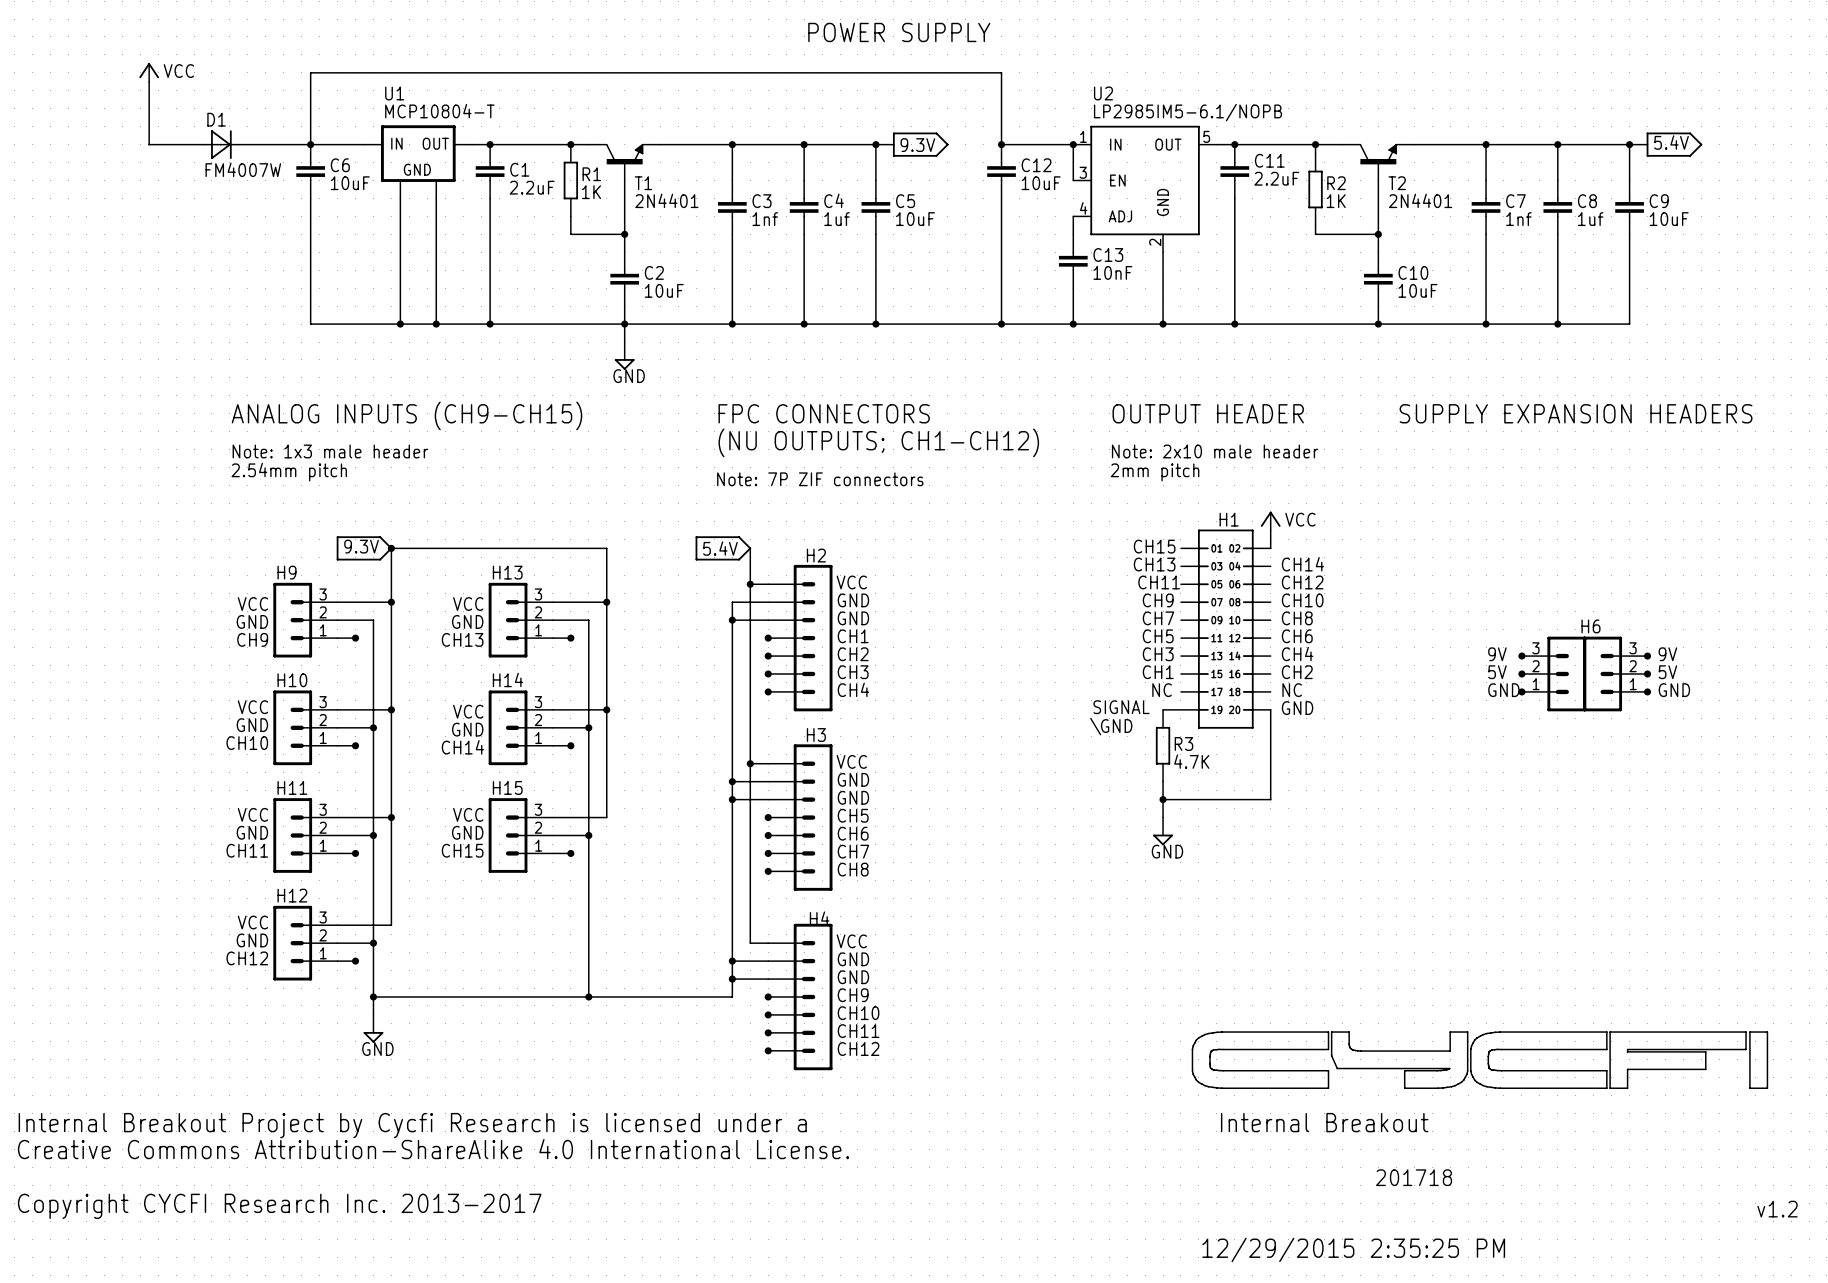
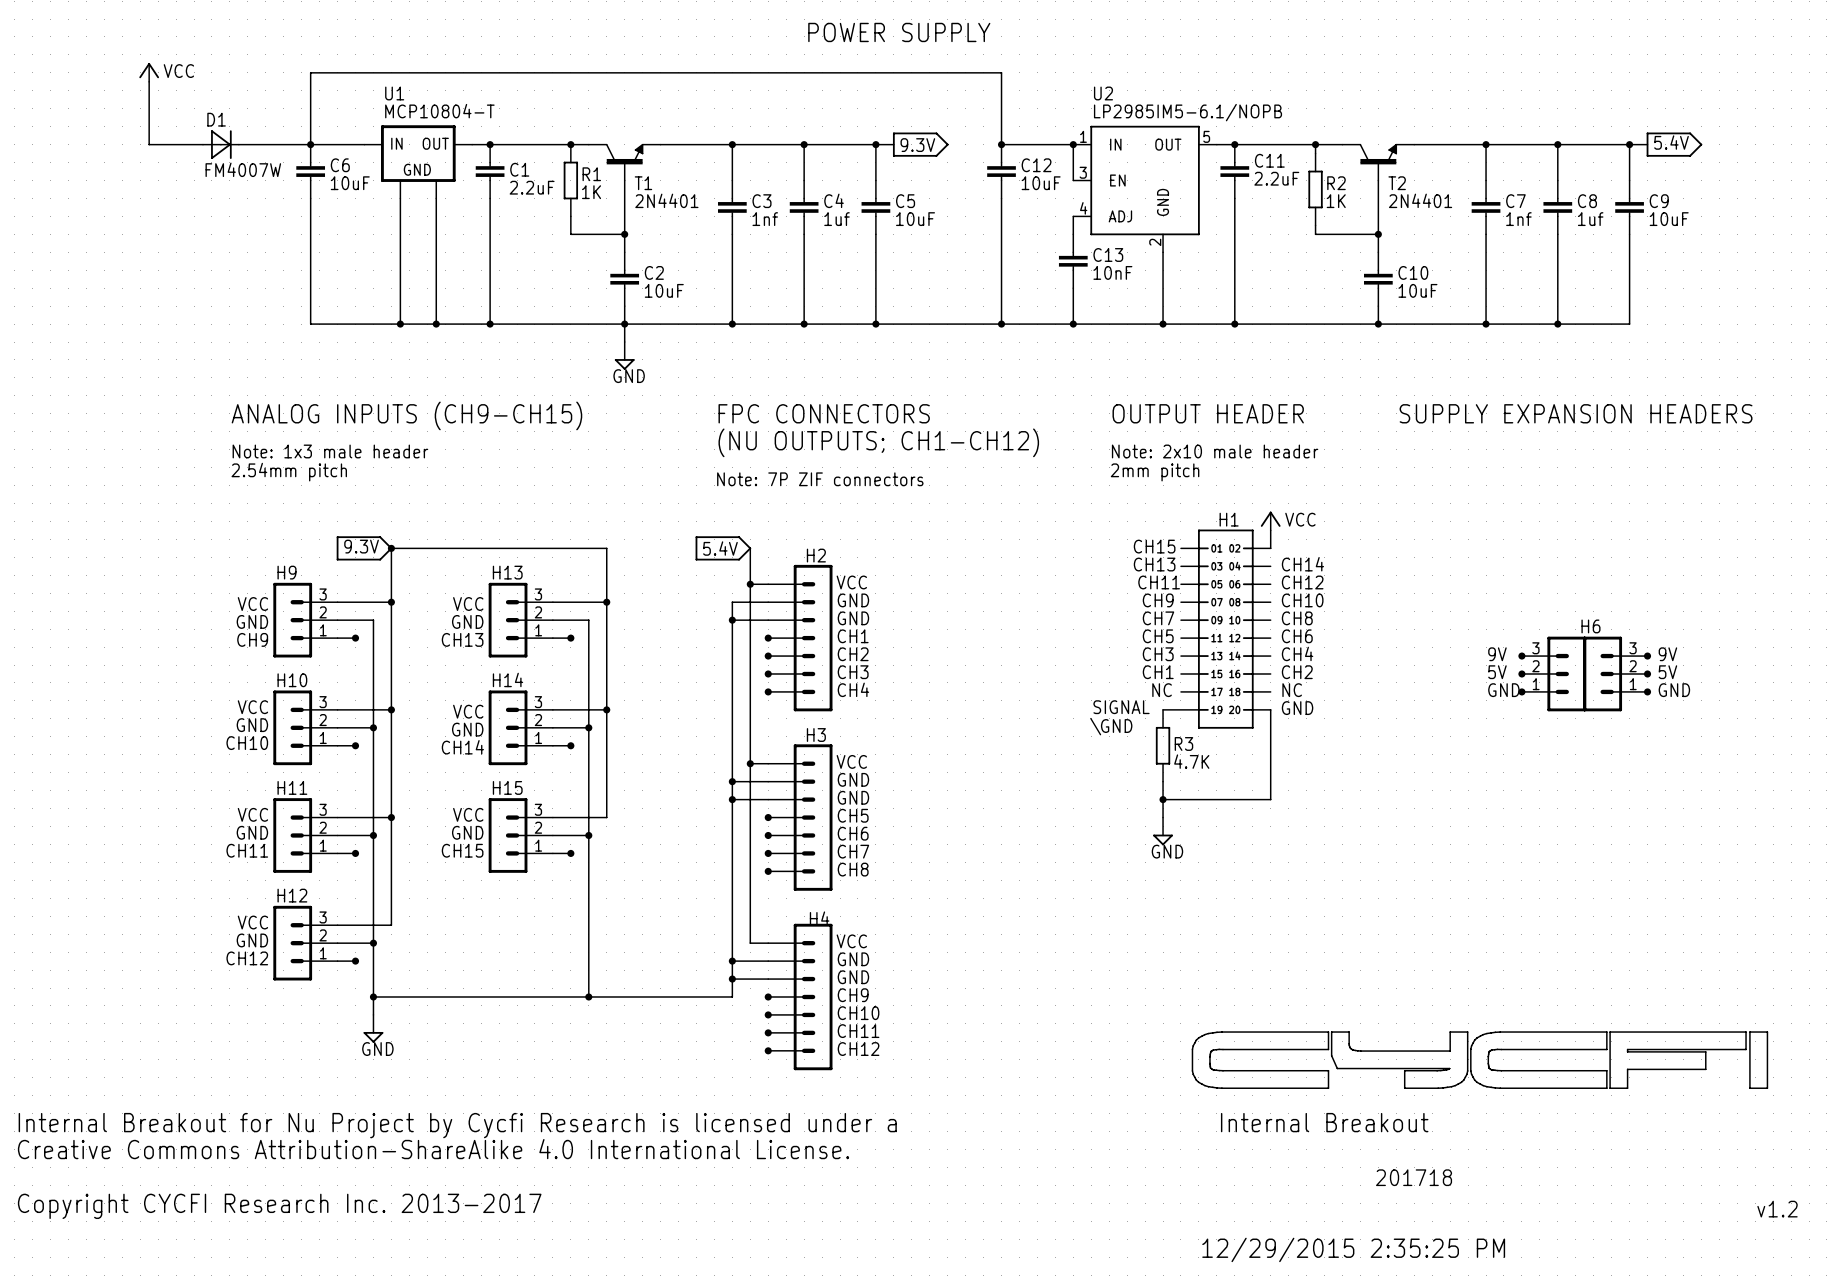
text: Internal Breakout Project by Cycfi Research is licensed under a (412, 1125) -> Internal Breakout for Nu Project by Cycfi Research is licensed under a (457, 1125)

